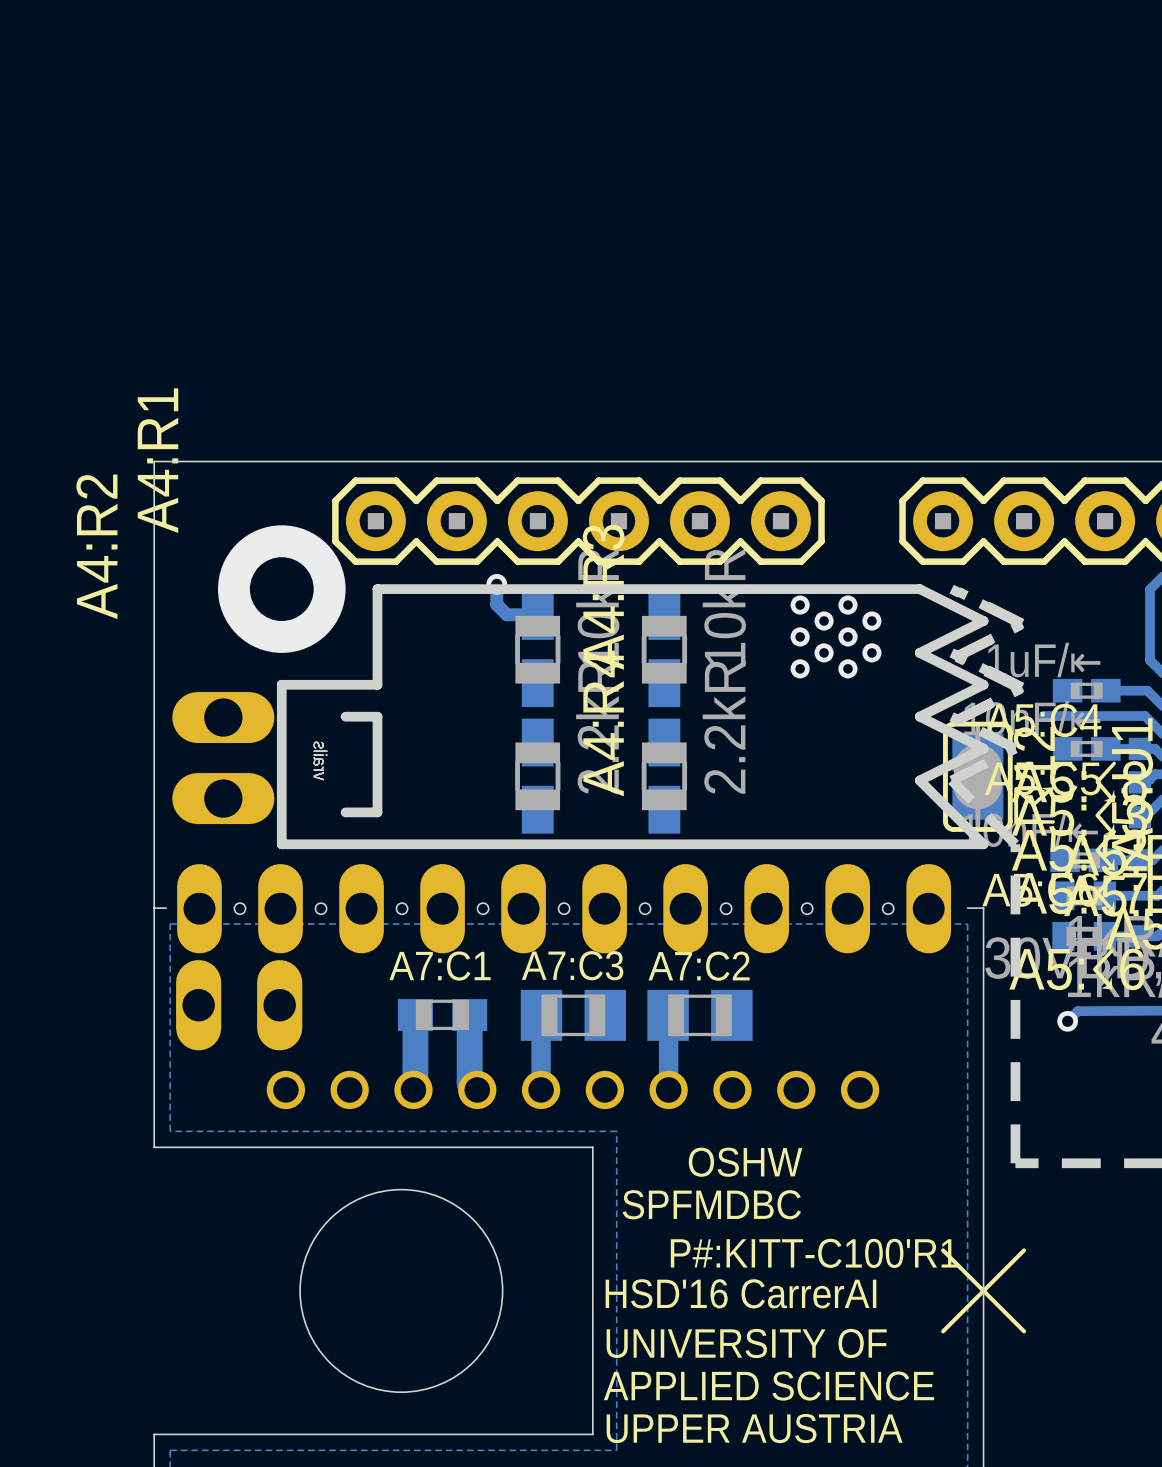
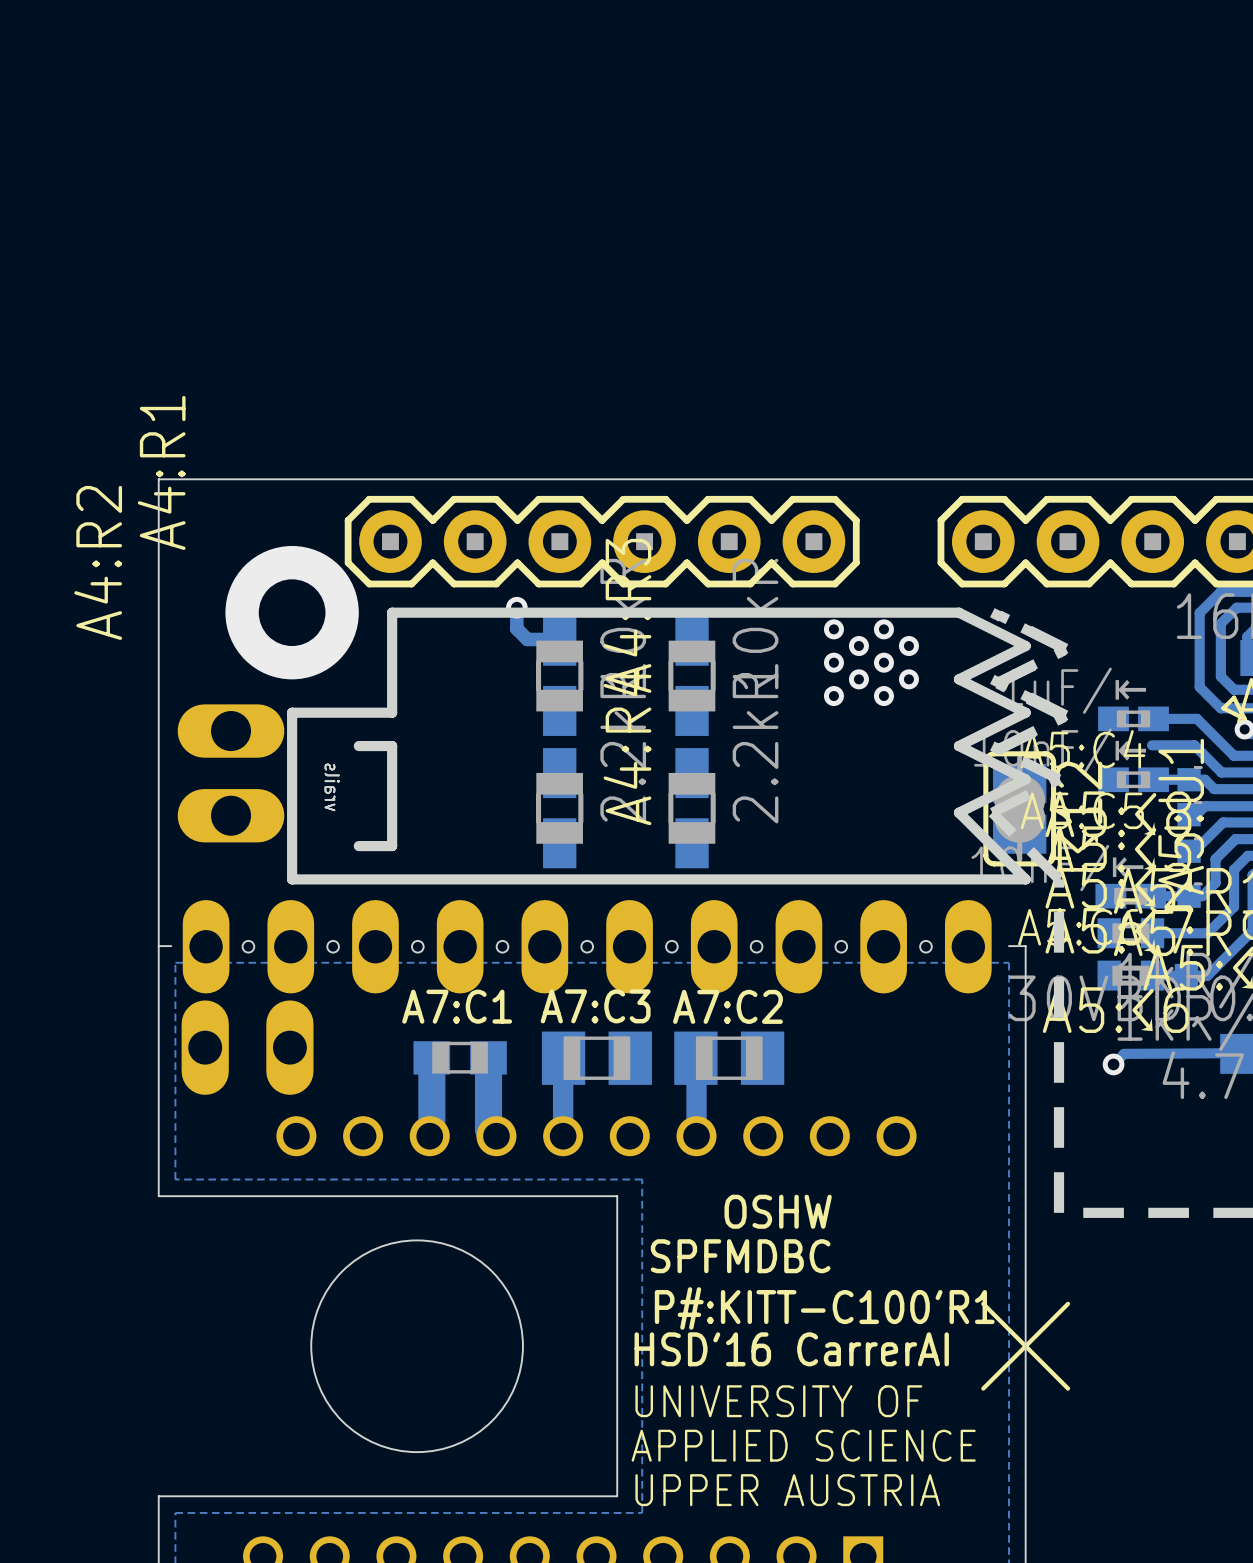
track: (1104, 716) (1043, 716) -> none
part position: (223, 758) -> (231, 773)

